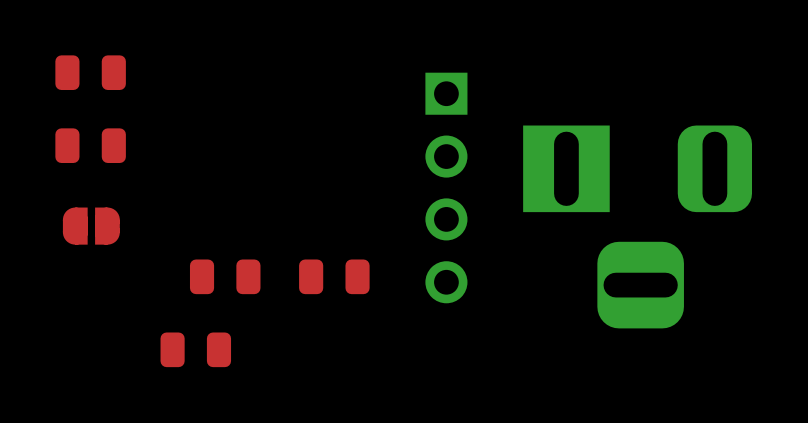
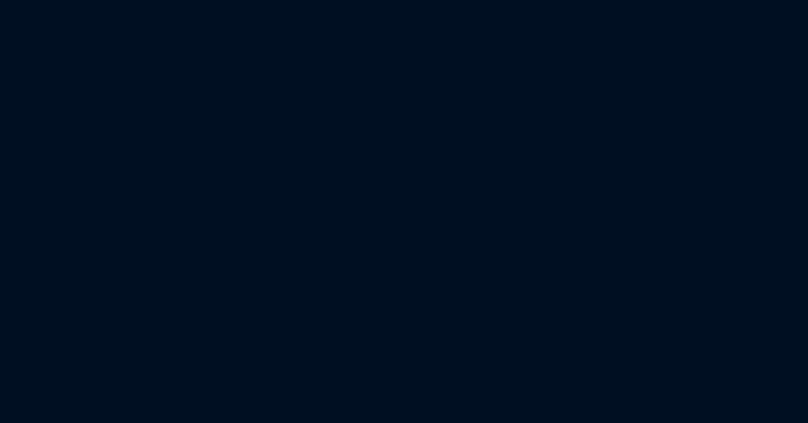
part: (90, 72) -> none
part: (90, 145) -> none
part: (446, 187) -> none
part: (91, 226) -> none
part: (637, 226) -> none
part: (225, 276) -> none
part: (334, 276) -> none
part: (195, 349) -> none

